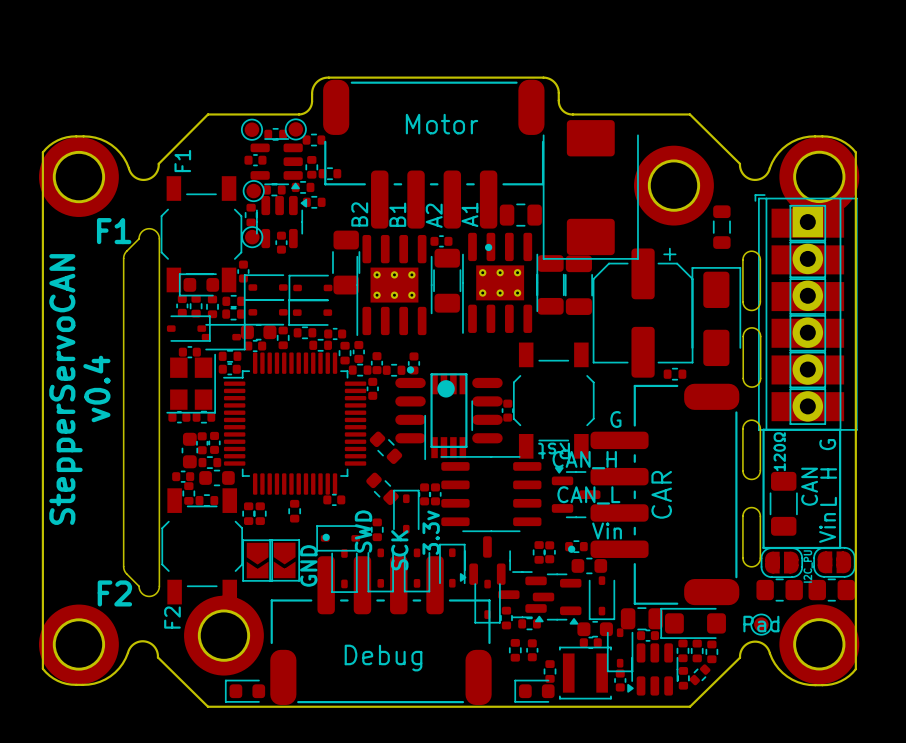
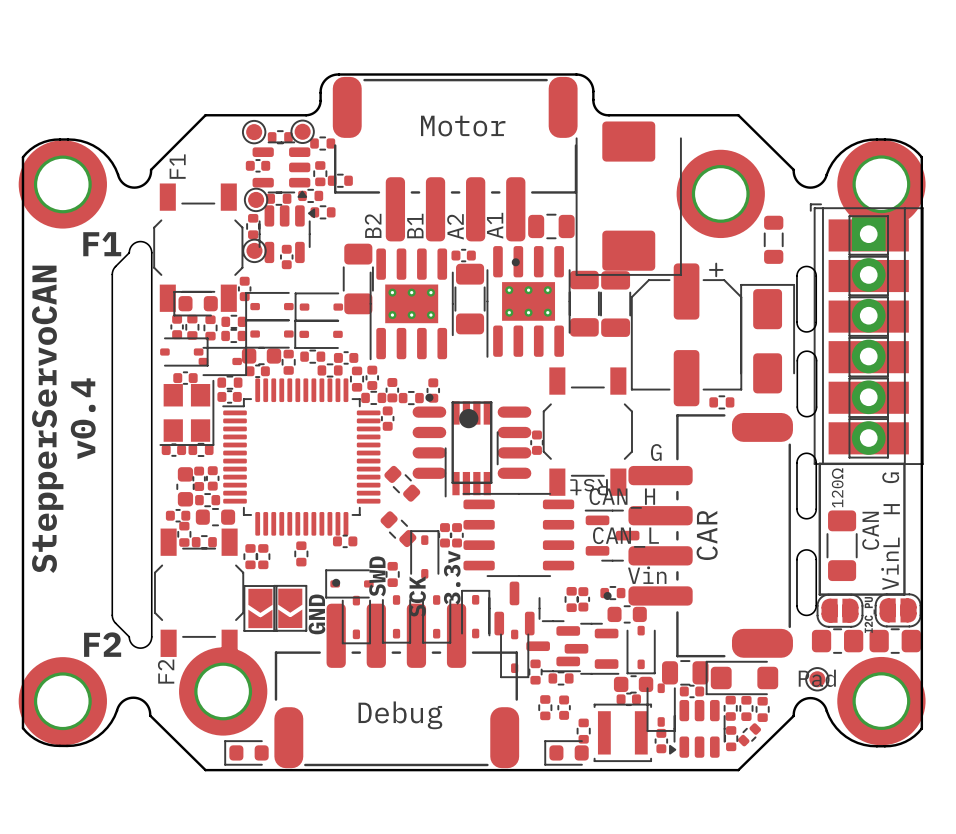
part footprint: [551, 467, 601, 519] -> [584, 509, 640, 562]
part footprint: [459, 536, 511, 585] -> [488, 581, 541, 637]
part footprint: [498, 571, 547, 623] -> [526, 620, 582, 673]
part footprint: [532, 573, 582, 625] -> [564, 622, 620, 675]

